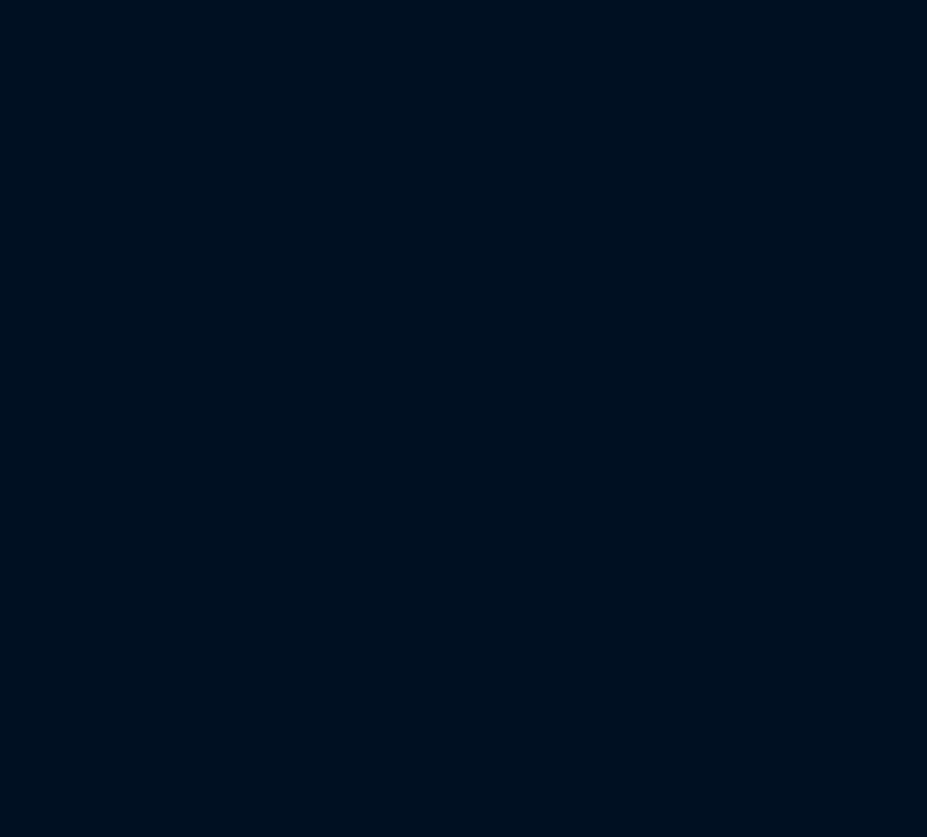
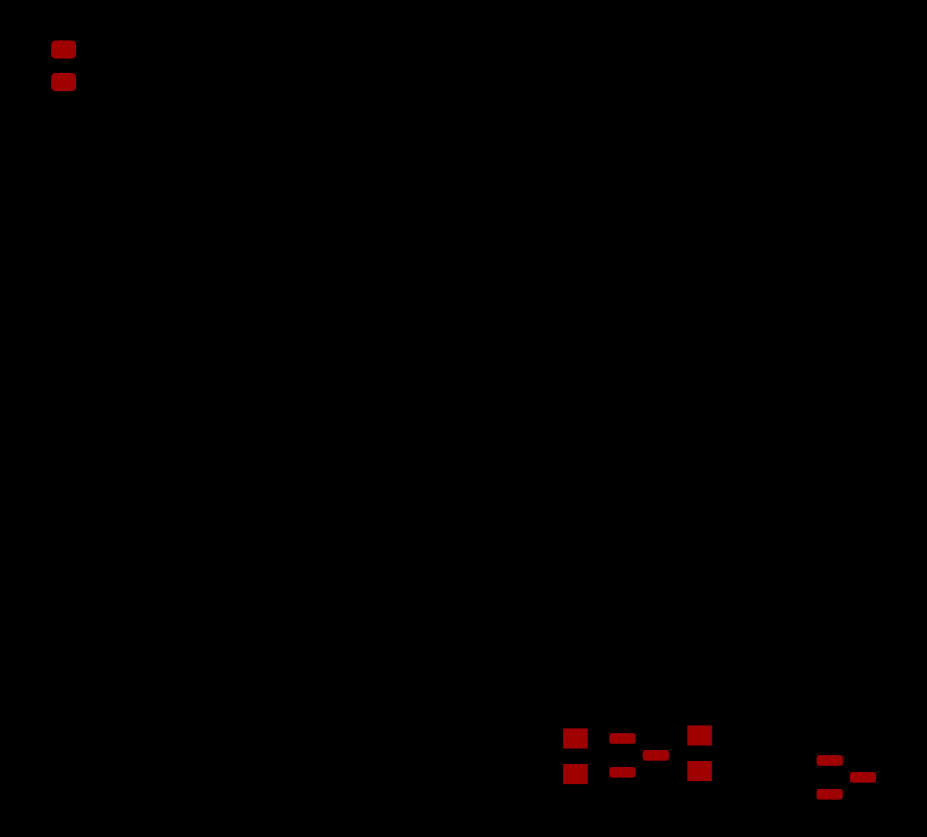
part: none -> (63, 65)
part: none -> (699, 753)
part: none -> (639, 755)
part: none -> (575, 756)
part: none -> (846, 777)

